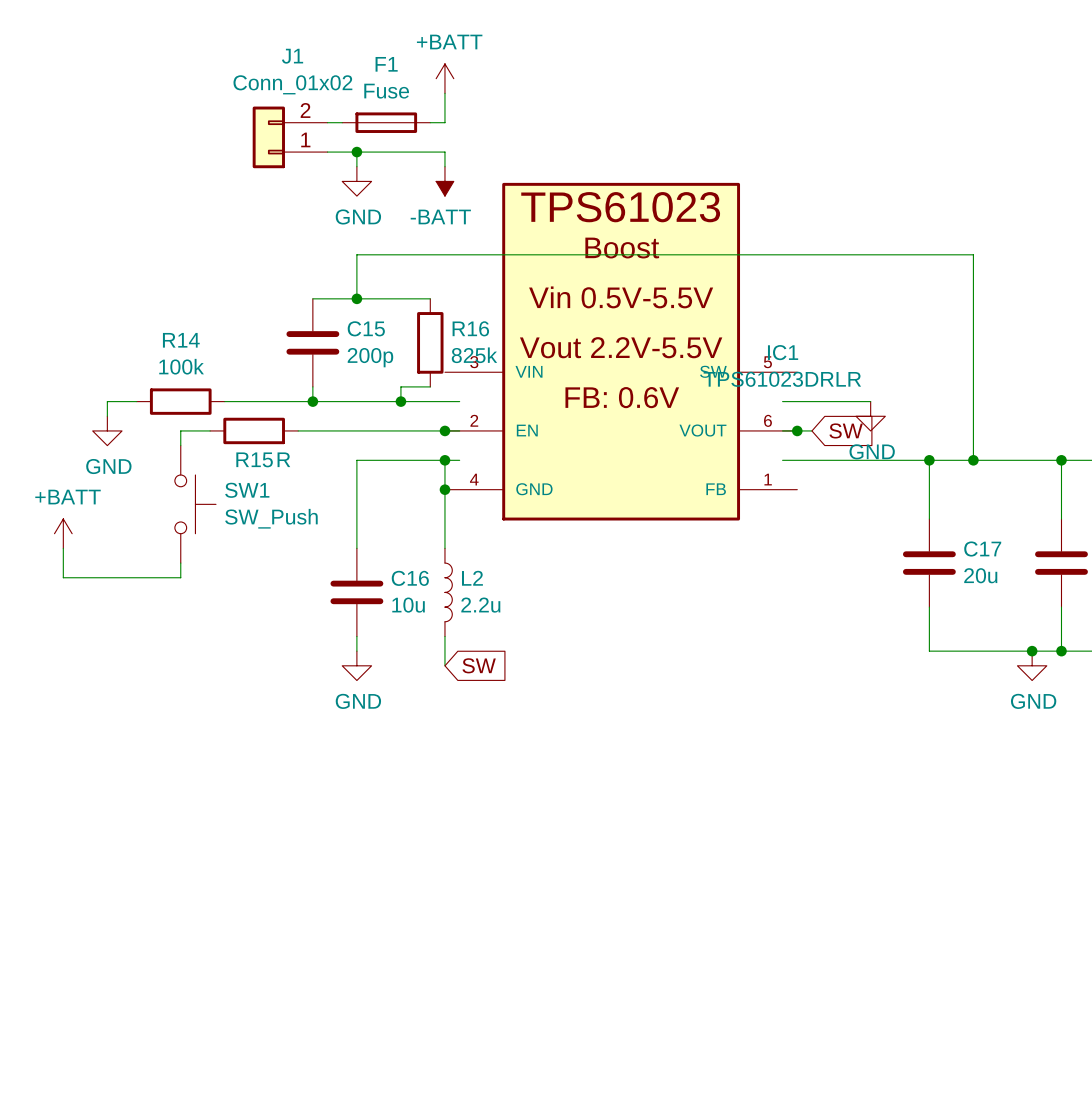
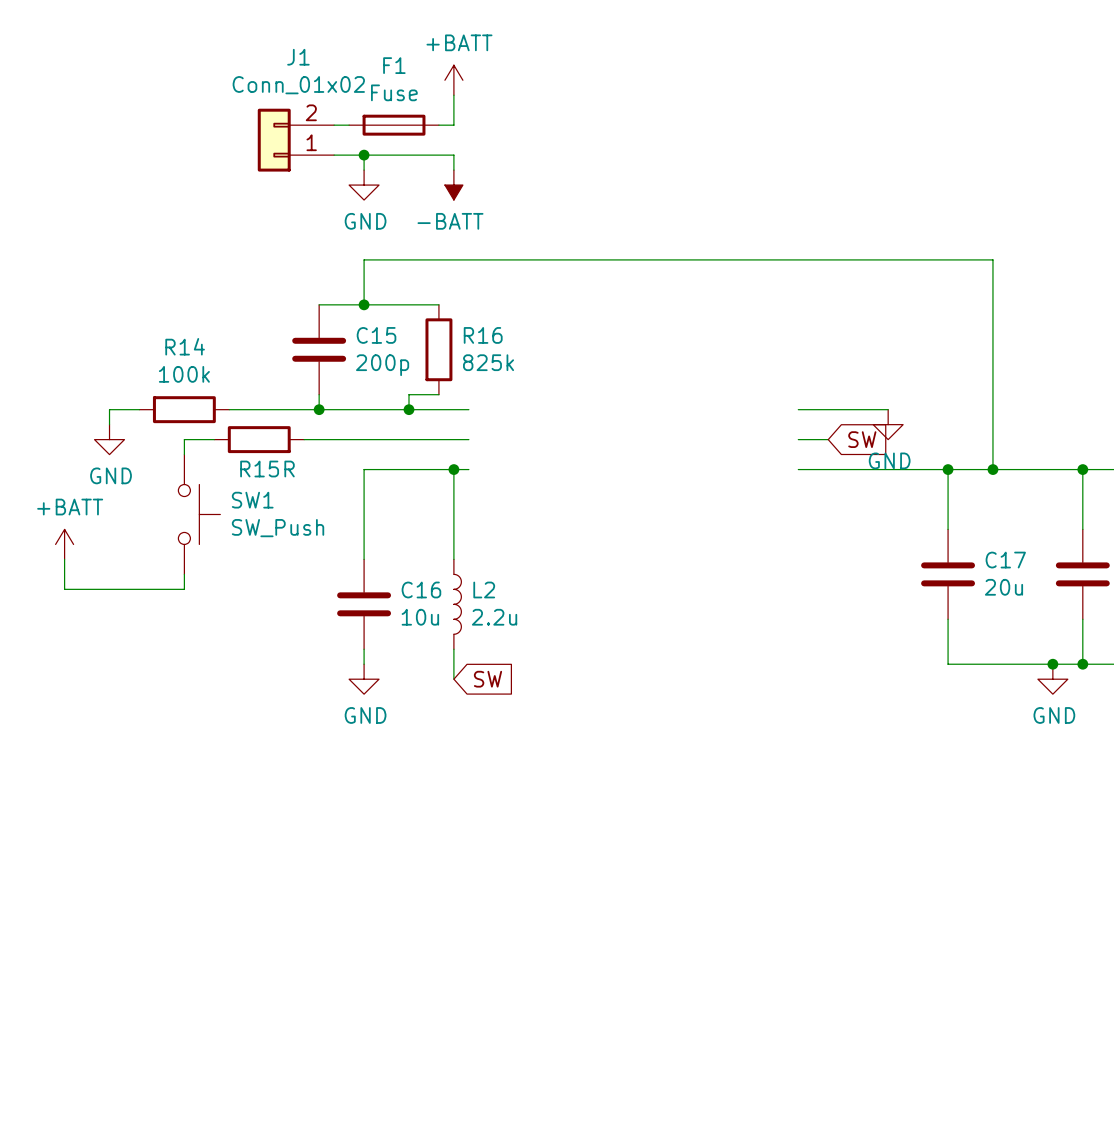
IC1: TPS61023DRLR (621, 351) -> none
junction: (444, 430) -> none
junction: (797, 430) -> none
junction: (444, 489) -> none

